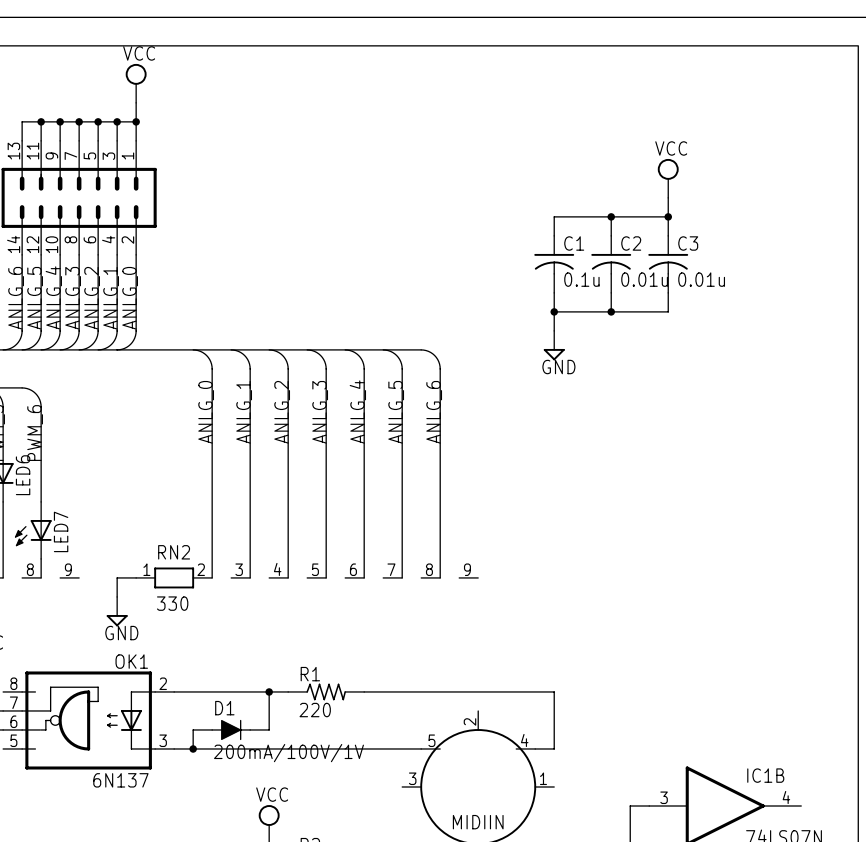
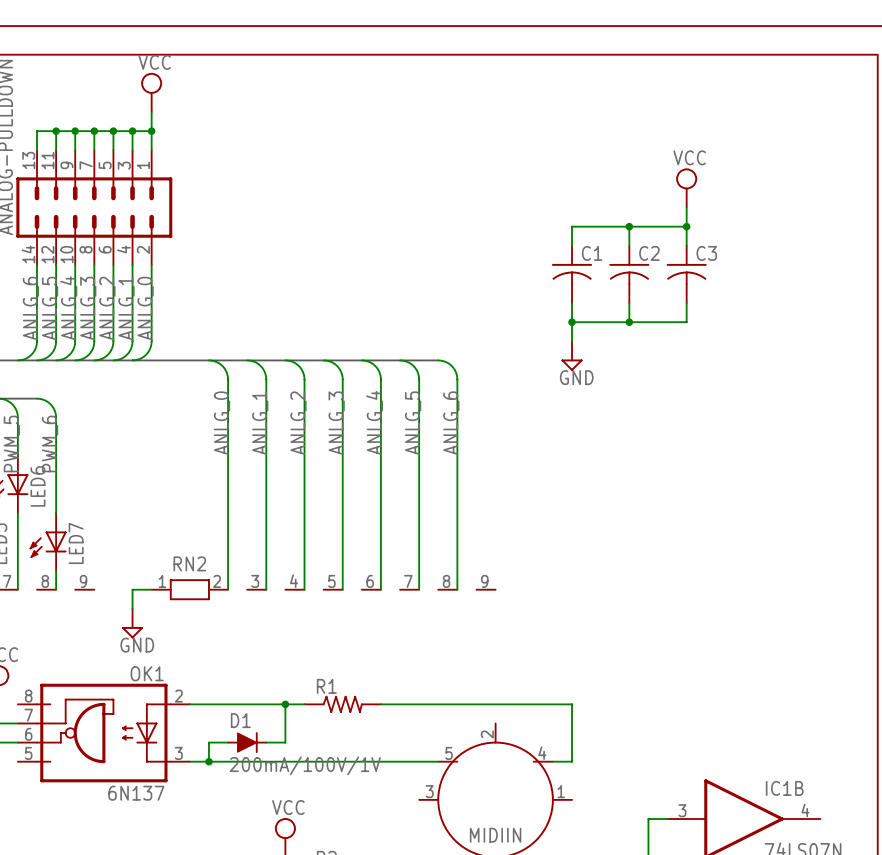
C1 value: 0.1u (581, 279) -> none
C2 value: 0.01u (644, 279) -> none
C3 value: 0.01u (701, 279) -> none
RN2 value: 330 (172, 603) -> none
R1 value: 220 (315, 710) -> none

